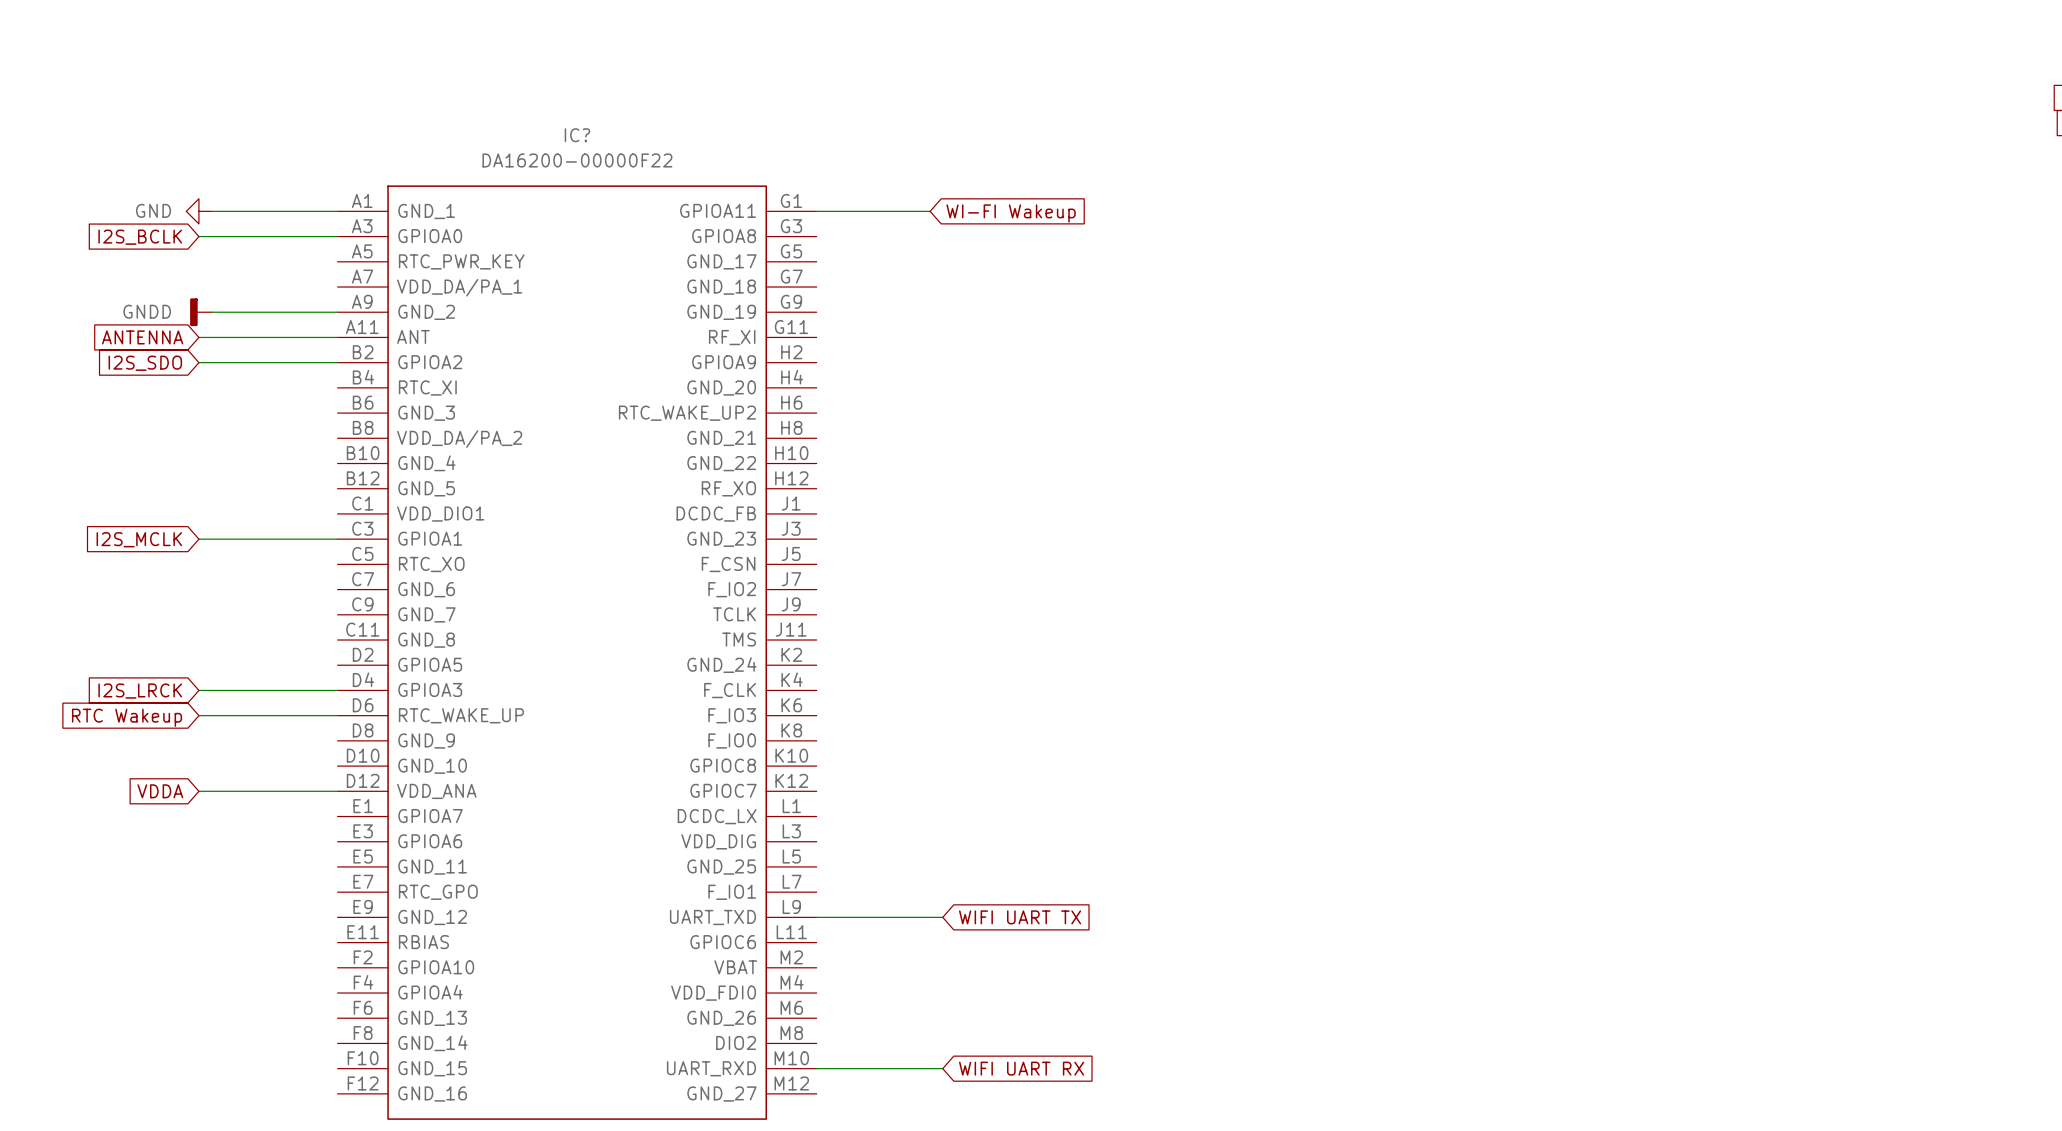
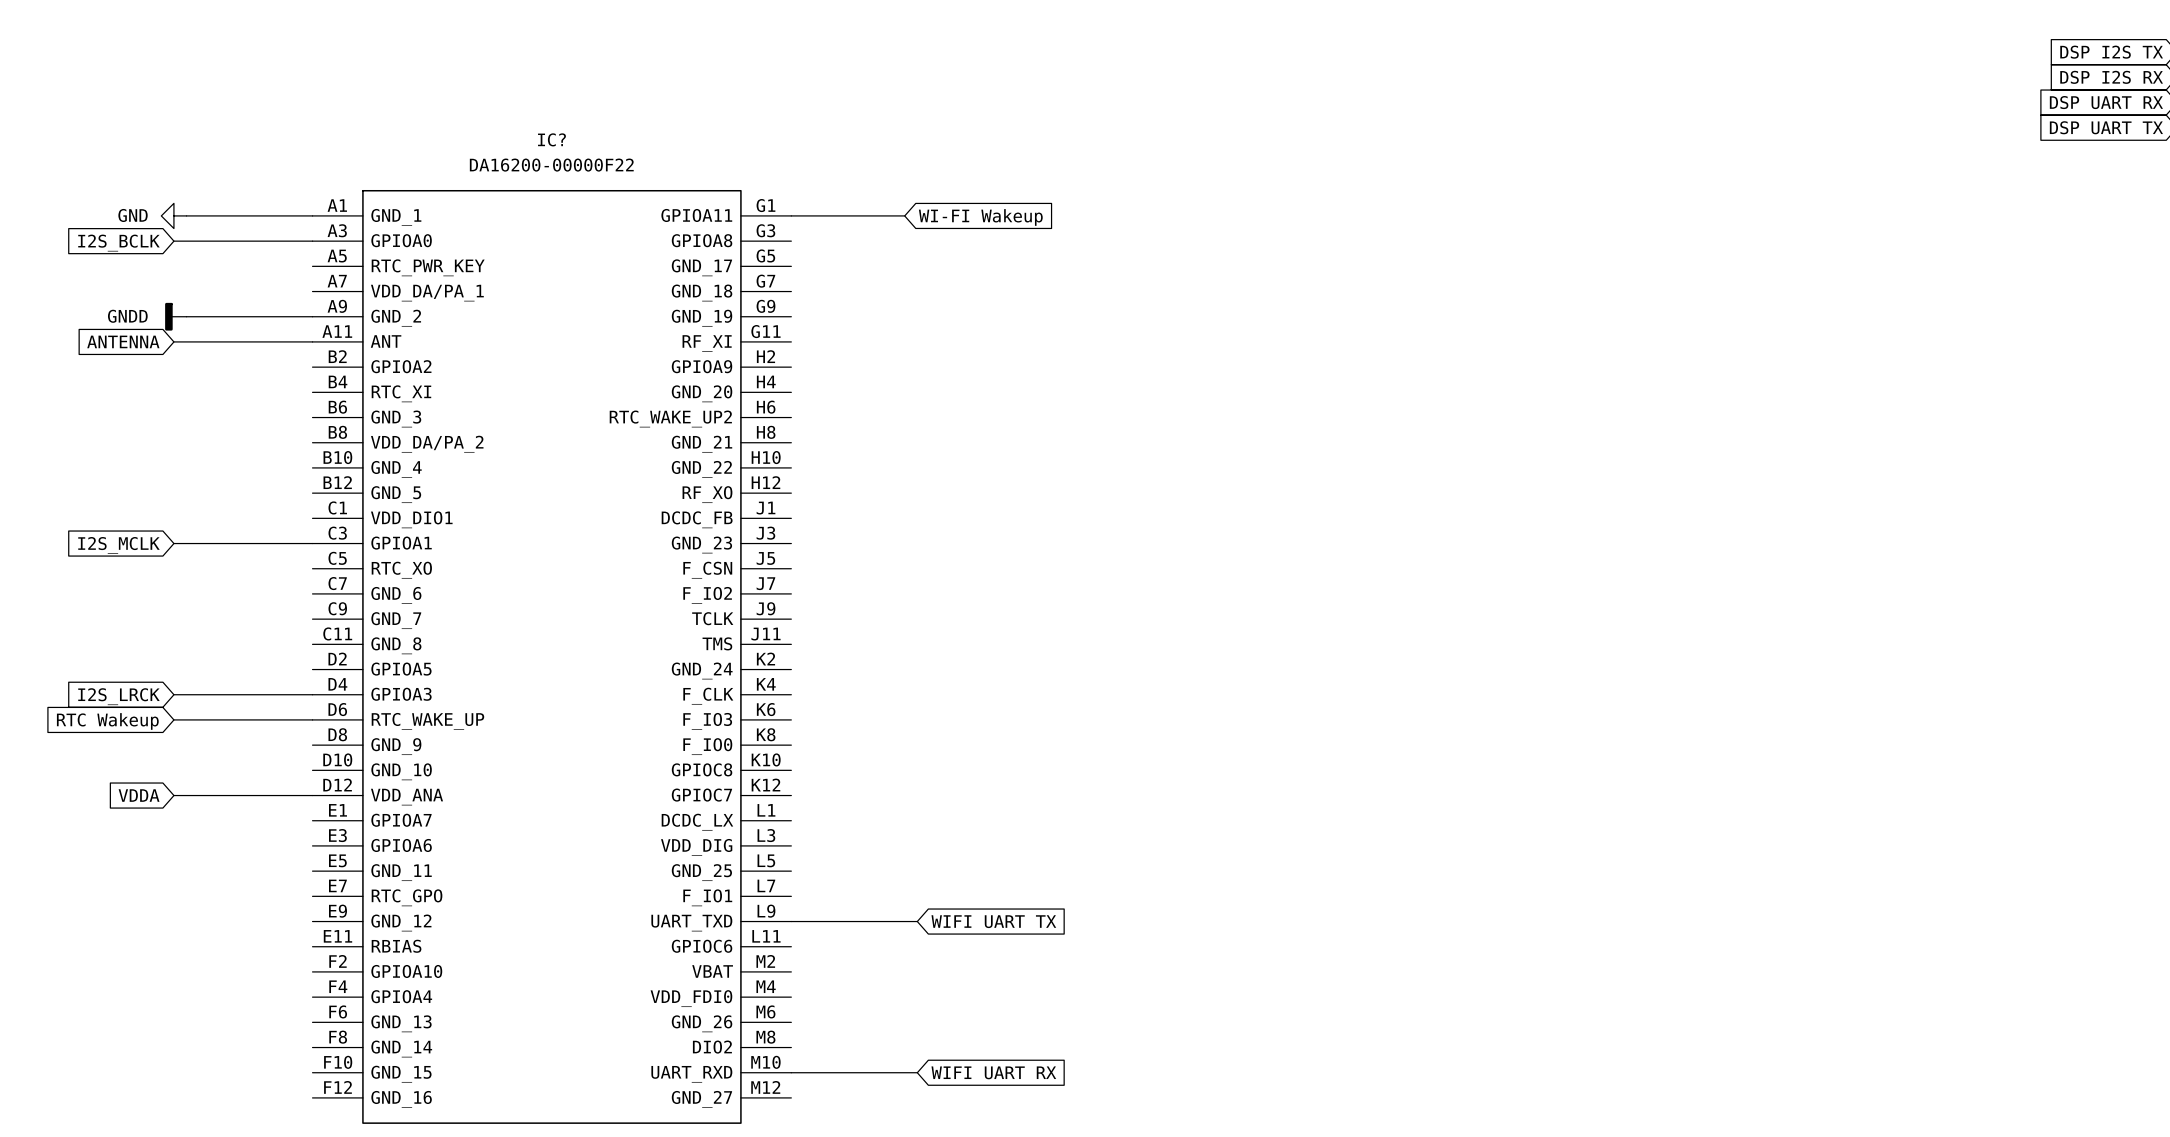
wire: (198, 362) (337, 362) -> none
global label: I2S_SDO (145, 363) -> none

